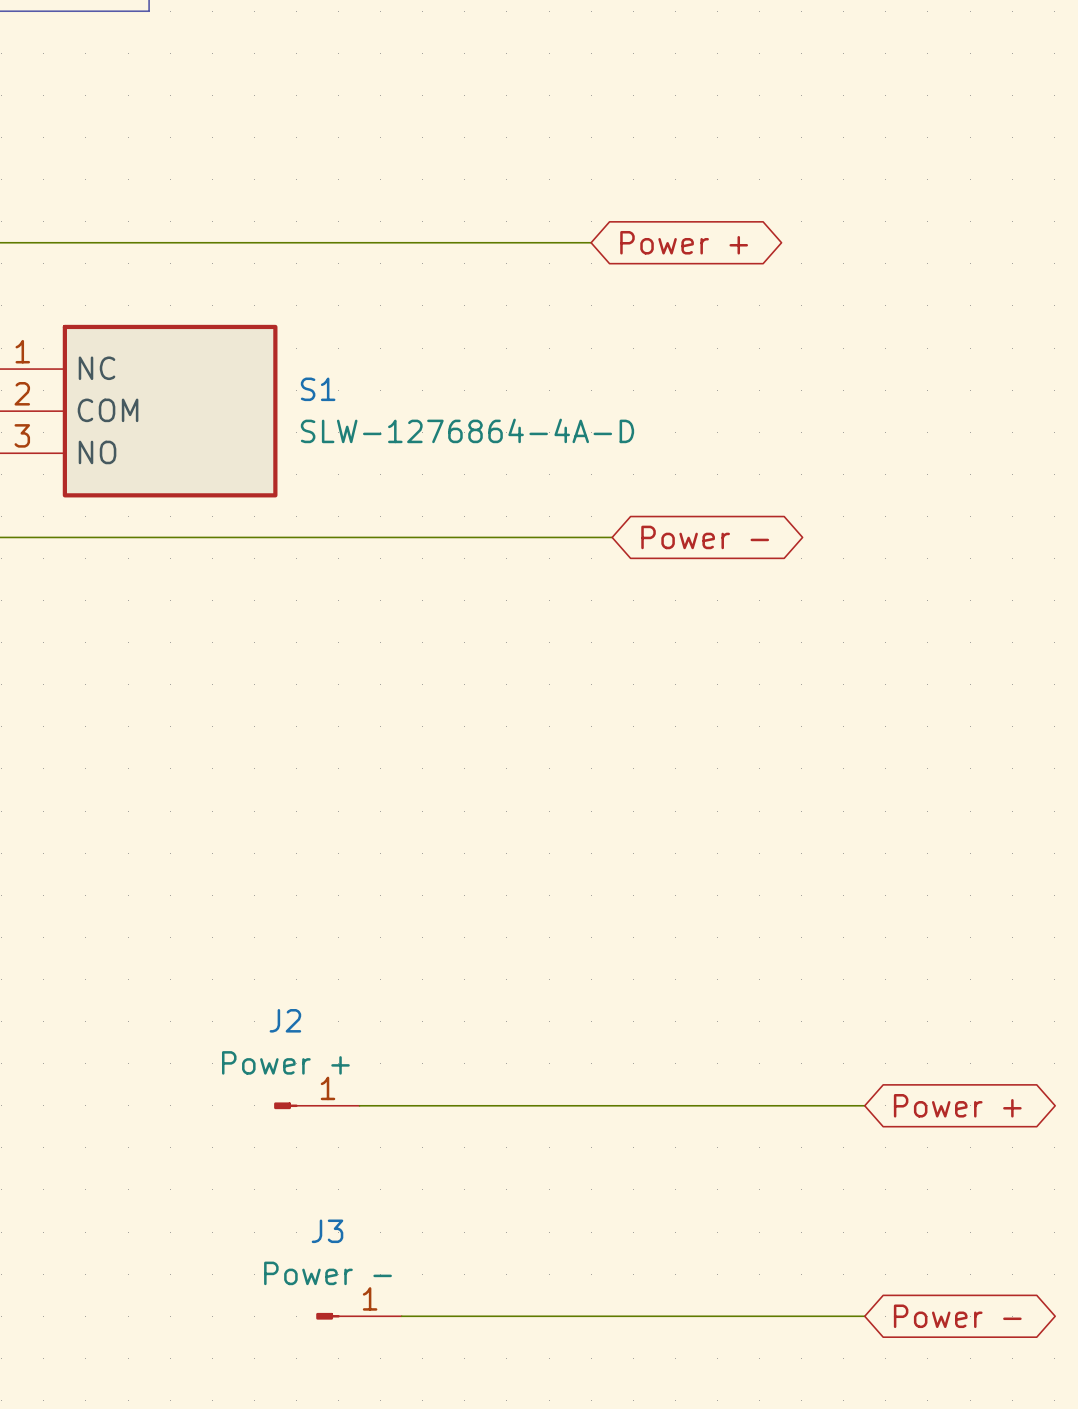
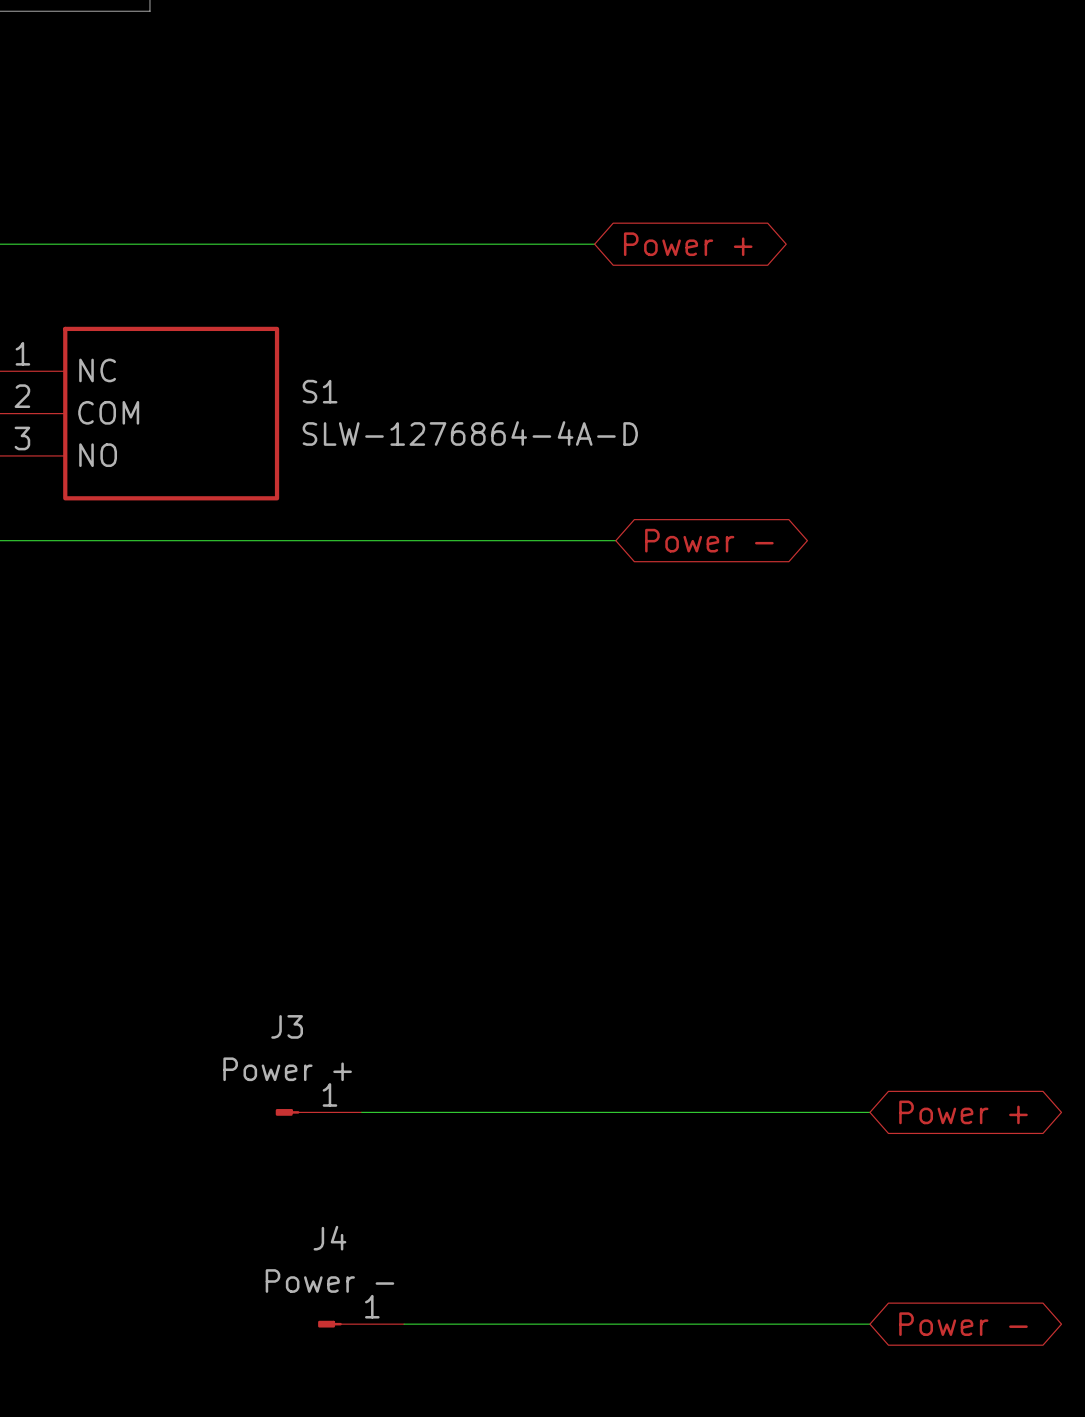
J2 name: J2 (285, 1020) -> J3 (287, 1026)
J3 name: J3 (327, 1231) -> J4 (329, 1238)

